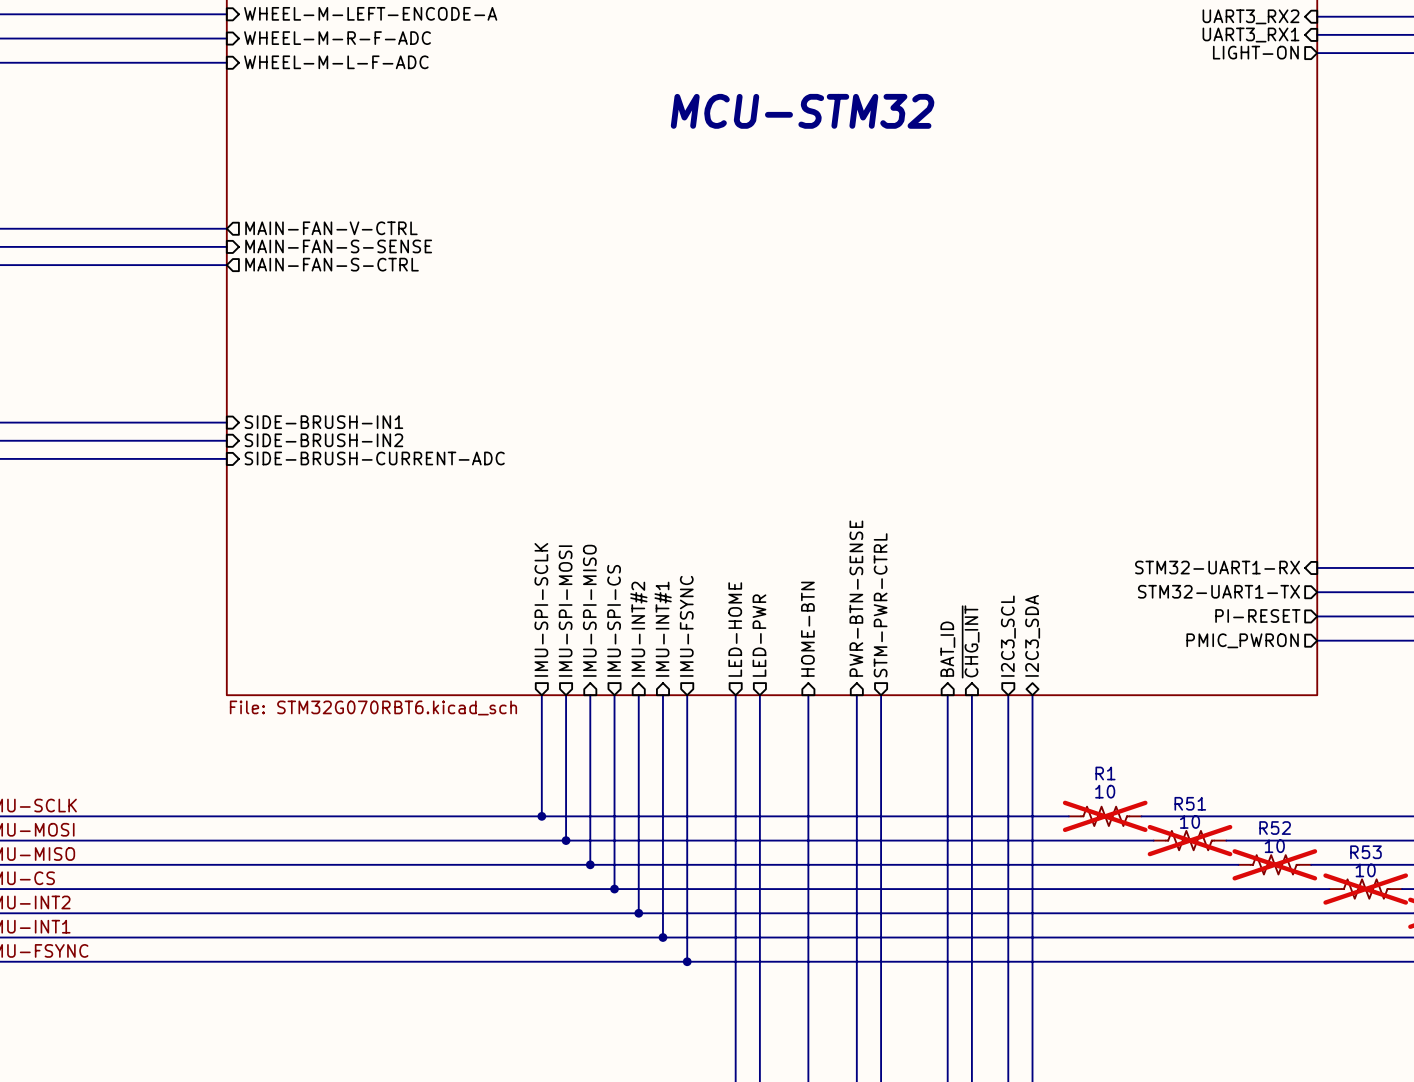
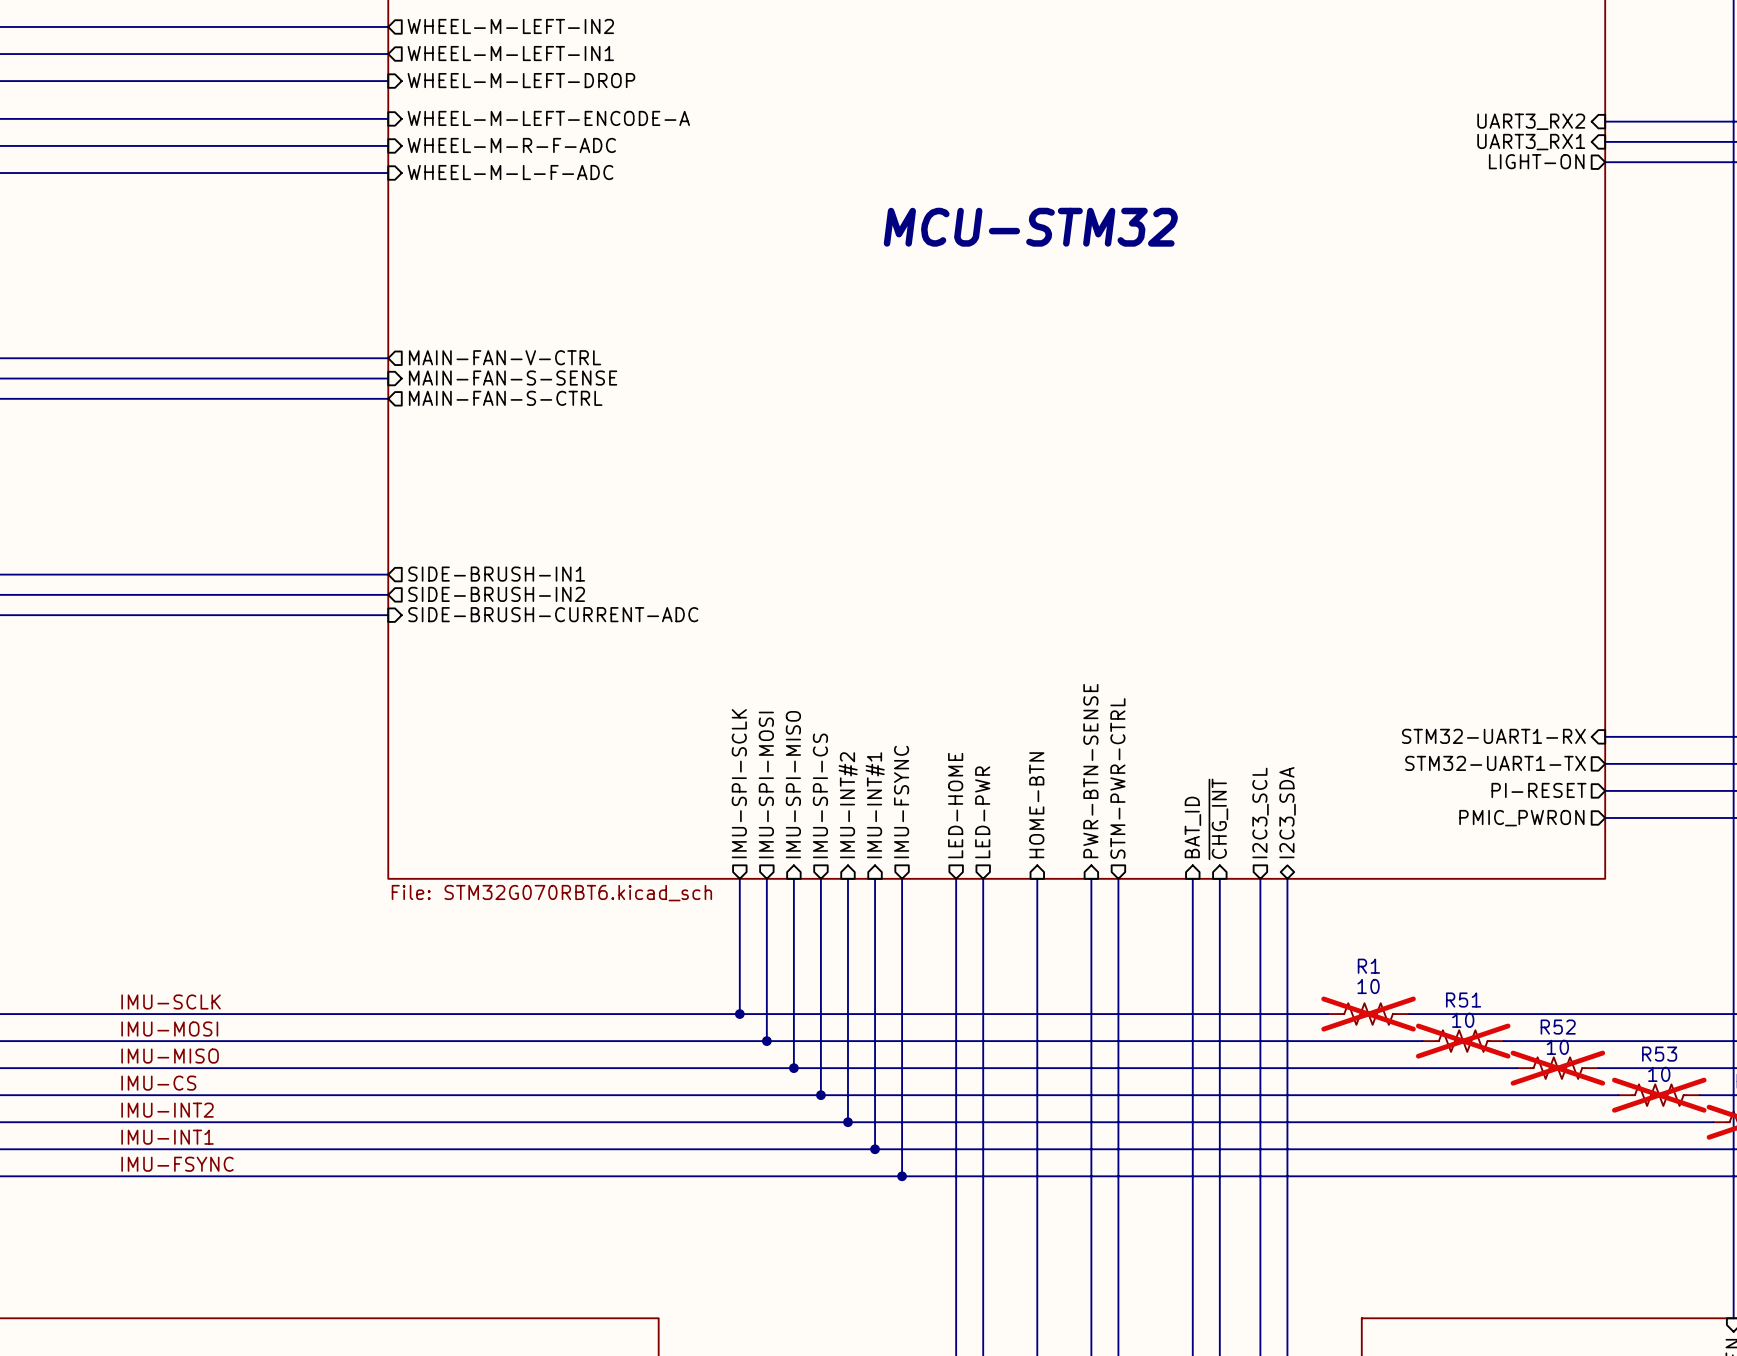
sheet pin shape: input (323, 422) -> output (496, 574)
sheet pin shape: input (323, 440) -> output (496, 594)

